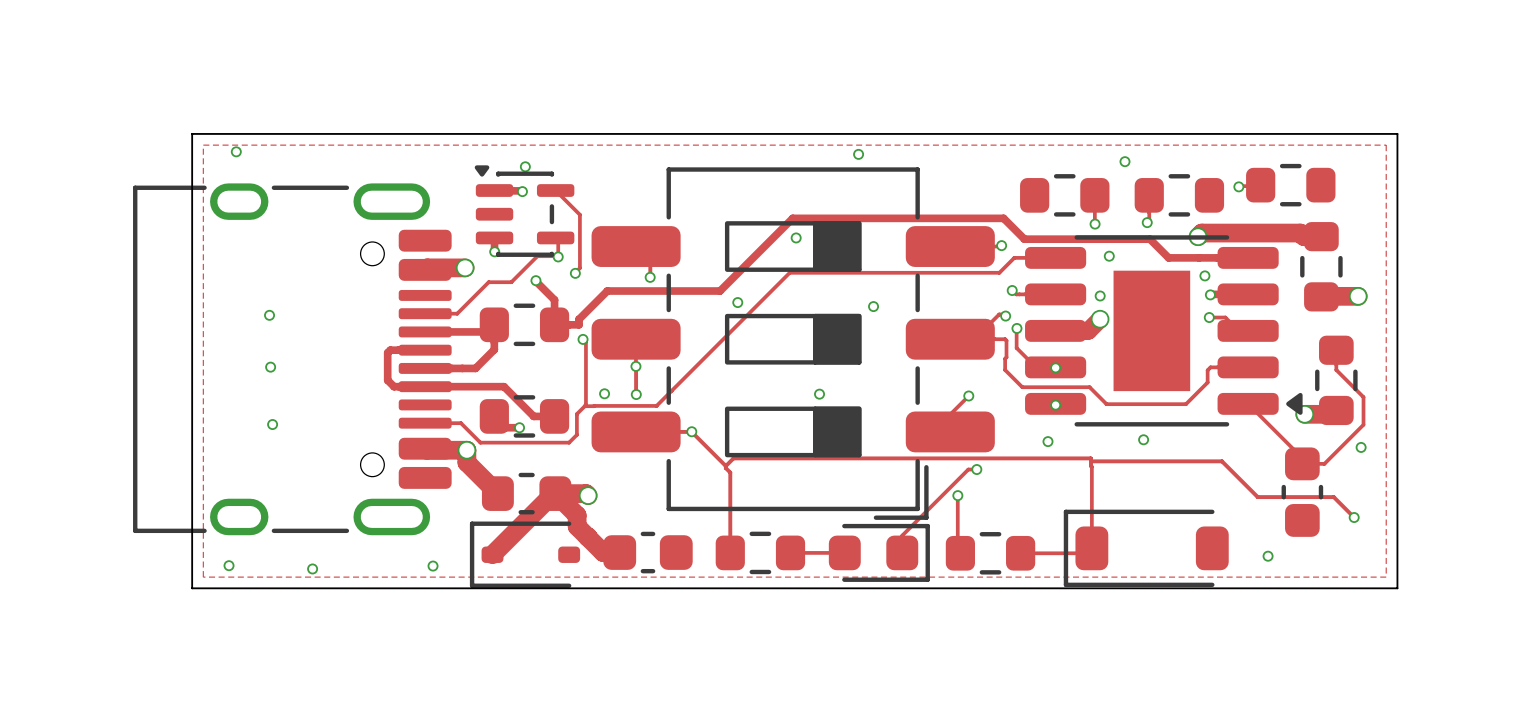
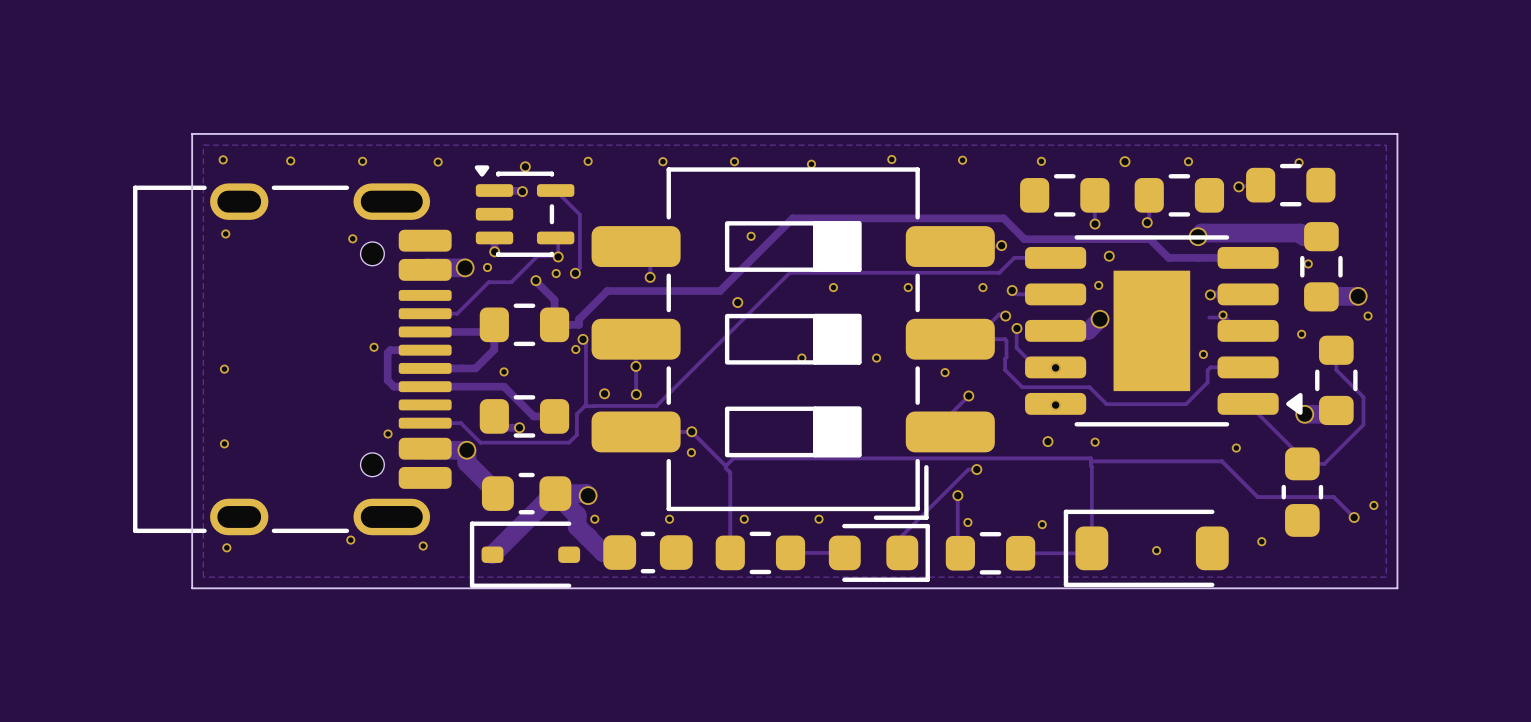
via: (236, 151) -> none
via: (858, 154) -> none
via: none -> (223, 159)
via: none -> (891, 159)
via: none -> (290, 160)
via: none -> (962, 160)
via: none -> (362, 161)
via: none -> (588, 161)
via: none -> (662, 161)
via: none -> (734, 161)
via: none -> (1041, 161)
via: none -> (1188, 161)
via: none -> (438, 162)
via: none -> (1299, 162)
via: none -> (811, 164)
via: none -> (225, 233)
via: none -> (751, 236)
via: (796, 237) -> none
via: none -> (352, 238)
via: none -> (1308, 263)
via: none -> (487, 267)
via: none -> (556, 273)
via: (1204, 275) -> none
via: none -> (1098, 285)
via: none -> (833, 287)
via: none -> (908, 287)
via: none -> (982, 287)
via: (1100, 295) -> none
via: (873, 306) -> none
via: (269, 315) -> none
via: none -> (1223, 315)
via: none -> (1368, 316)
via: (1209, 317) -> none
via: none -> (1301, 334)
via: none -> (374, 347)
via: none -> (575, 349)
via: none -> (1203, 354)
via: none -> (801, 358)
via: none -> (876, 358)
via: (270, 367) -> none
via: none -> (224, 369)
via: none -> (504, 371)
via: none -> (945, 372)
via: (819, 394) -> none
via: (272, 424) -> none
via: none -> (388, 433)
via: (1143, 439) -> none
via: none -> (1095, 442)
via: none -> (224, 443)
via: (1361, 447) -> none
via: none -> (1236, 448)
via: none -> (691, 452)
via: none -> (1373, 505)
via: none -> (594, 519)
via: none -> (669, 519)
via: none -> (744, 519)
via: none -> (819, 519)
via: none -> (967, 522)
via: none -> (1042, 524)
via: none -> (350, 540)
via: none -> (1261, 541)
via: none -> (423, 546)
via: none -> (226, 547)
via: none -> (1156, 550)
via: (1268, 556) -> none
via: (229, 565) -> none
via: (433, 566) -> none
via: (312, 568) -> none

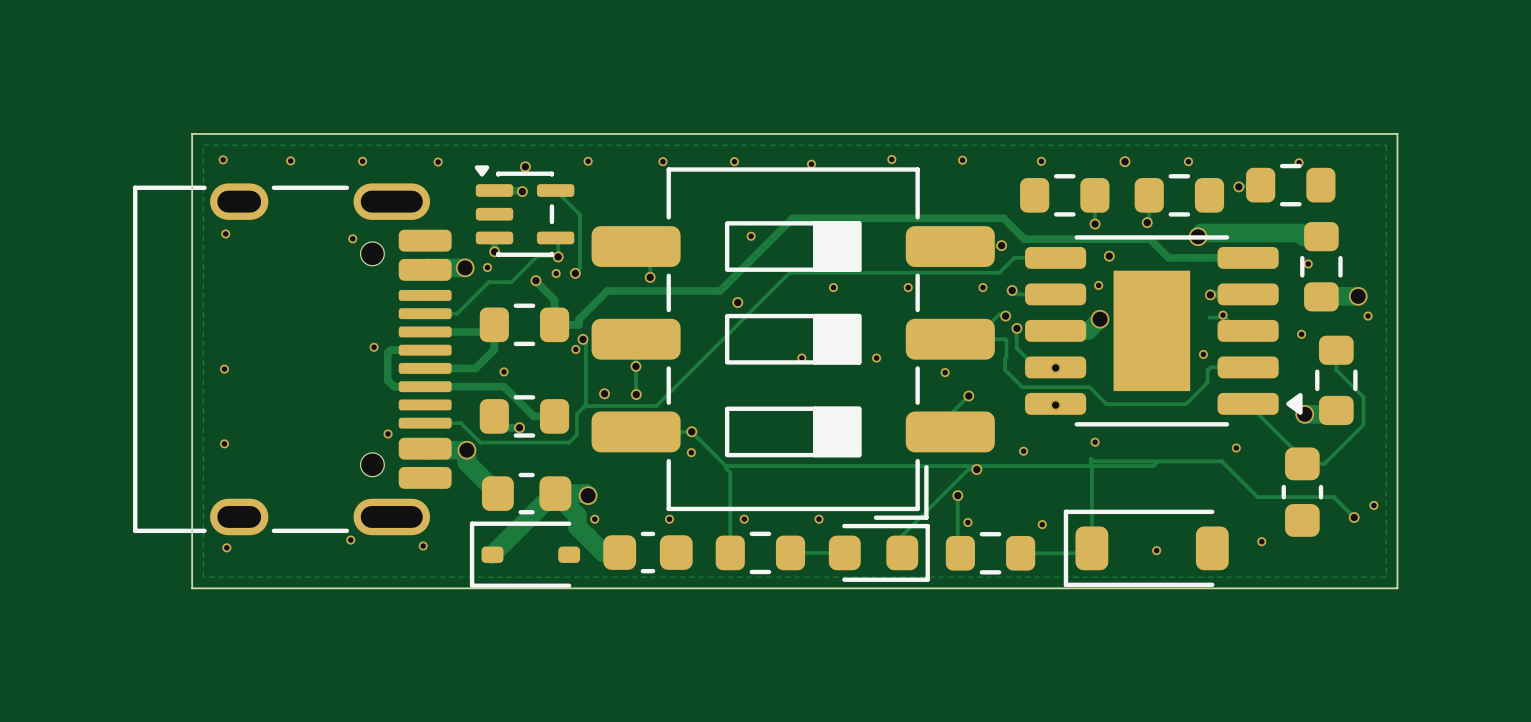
via: (1047, 441) -> none
via: none -> (1023, 451)
track: (1090, 458) (733, 458) (725, 466) -> (1158, 461) (1153, 466) (725, 466)

